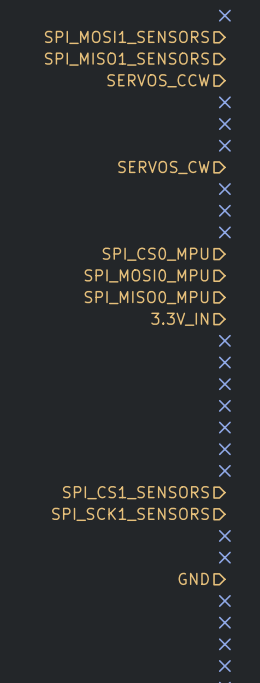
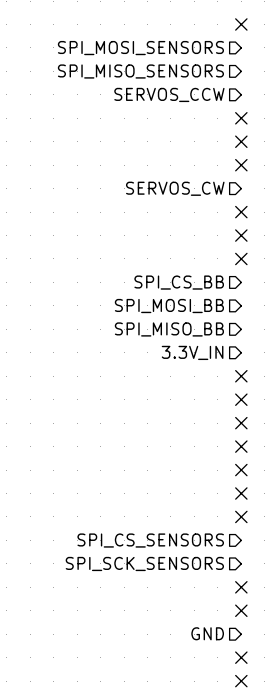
hierarchical label: SPI_MOSI1_SENSORS (126, 37) -> SPI_MOSI_SENSORS (140, 48)
hierarchical label: SPI_MISO1_SENSORS (126, 59) -> SPI_MISO_SENSORS (140, 71)
hierarchical label: SPI_CS0_MPU (155, 254) -> SPI_CS_BB (179, 282)
hierarchical label: SPI_MOSI0_MPU (146, 275) -> SPI_MOSI_BB (169, 306)
hierarchical label: SPI_MISO0_MPU (146, 297) -> SPI_MISO_BB (169, 329)
hierarchical label: SPI_CS1_SENSORS (135, 492) -> SPI_CS_SENSORS (150, 540)
hierarchical label: SPI_SCK1_SENSORS (130, 514) -> SPI_SCK_SENSORS (144, 563)

